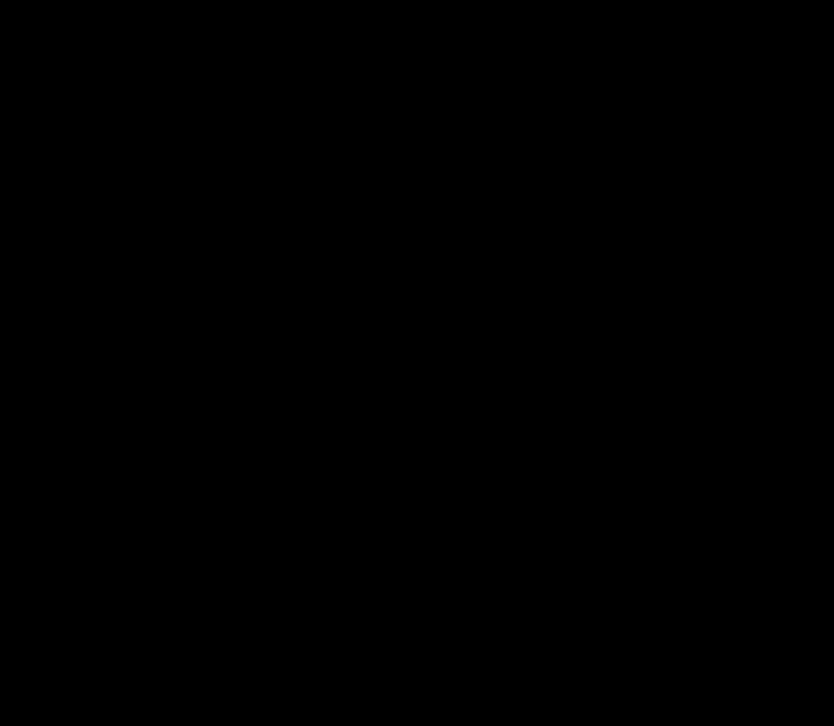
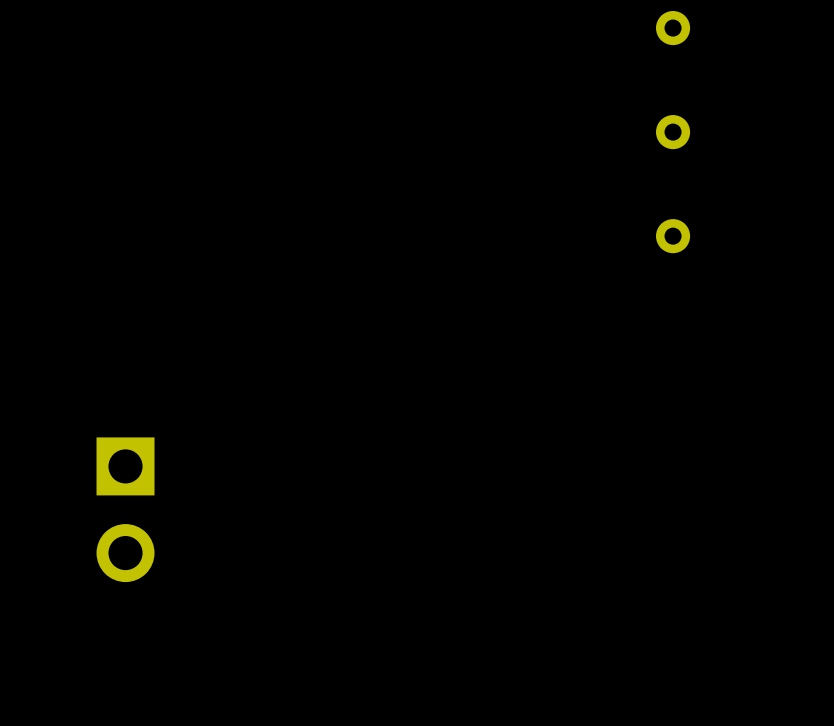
part: none -> (673, 28)
part: none -> (673, 132)
part: none -> (673, 236)
part: none -> (125, 509)

